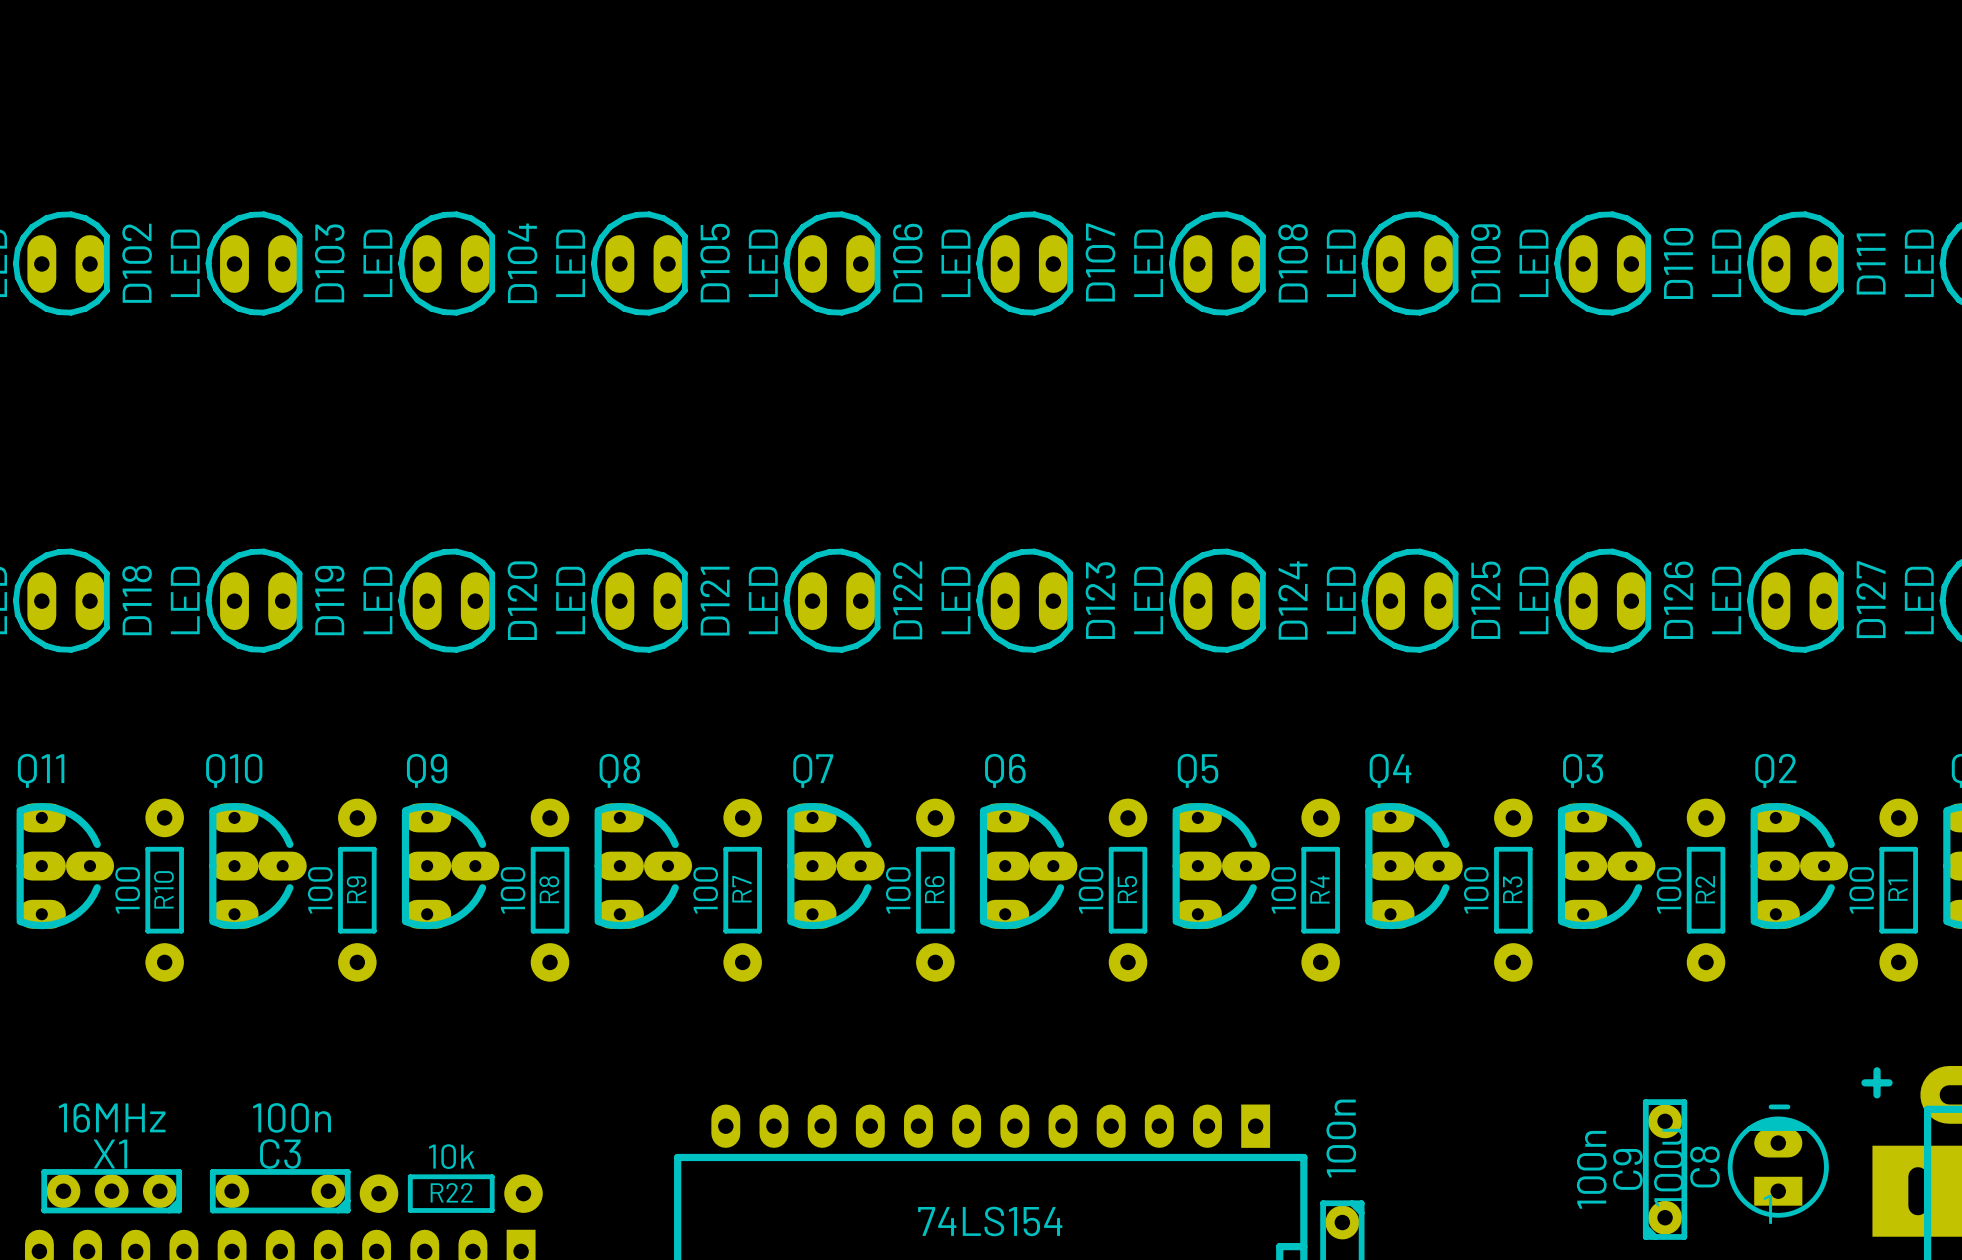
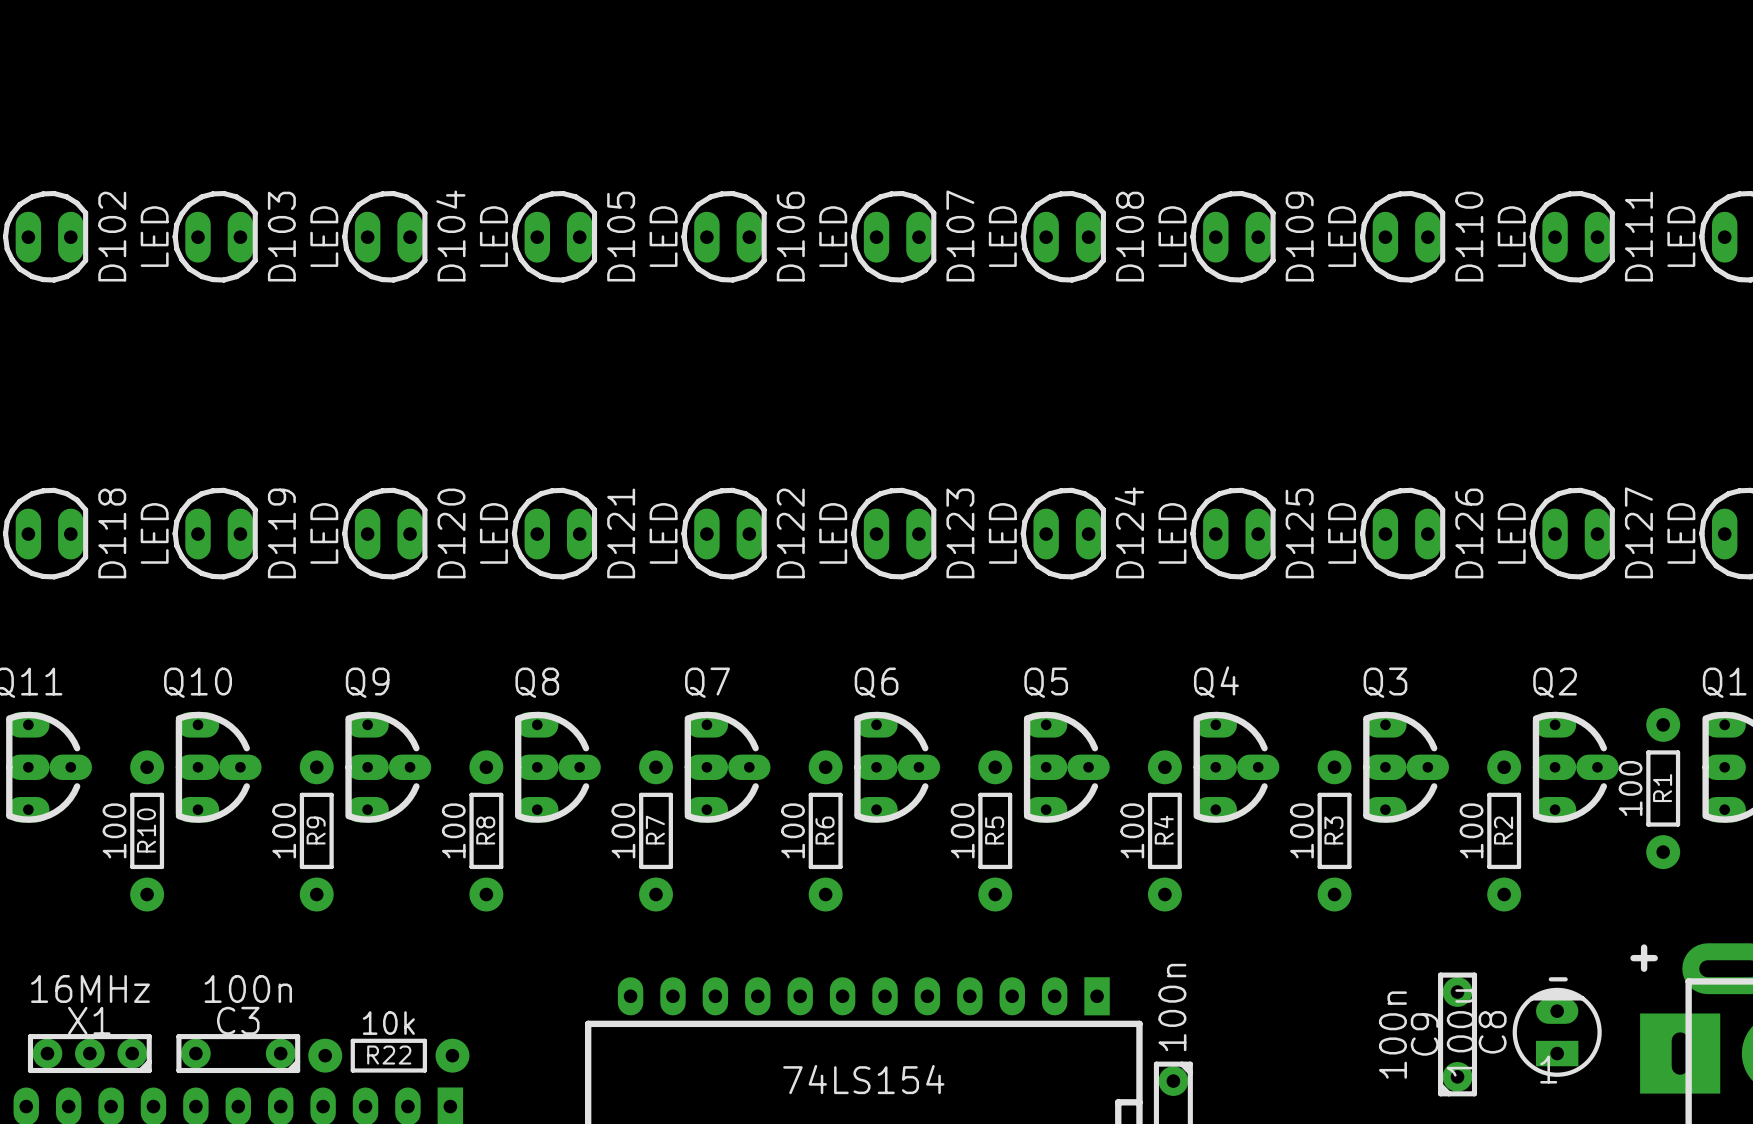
R10 position: (164, 890) -> (147, 830)
R9 position: (357, 890) -> (316, 830)
R8 position: (550, 890) -> (486, 830)
R7 position: (742, 890) -> (656, 830)
R6 position: (935, 890) -> (825, 830)
R5 position: (1128, 890) -> (995, 830)
R4 position: (1320, 890) -> (1164, 830)
R3 position: (1513, 890) -> (1334, 830)
R2 position: (1706, 890) -> (1504, 830)

